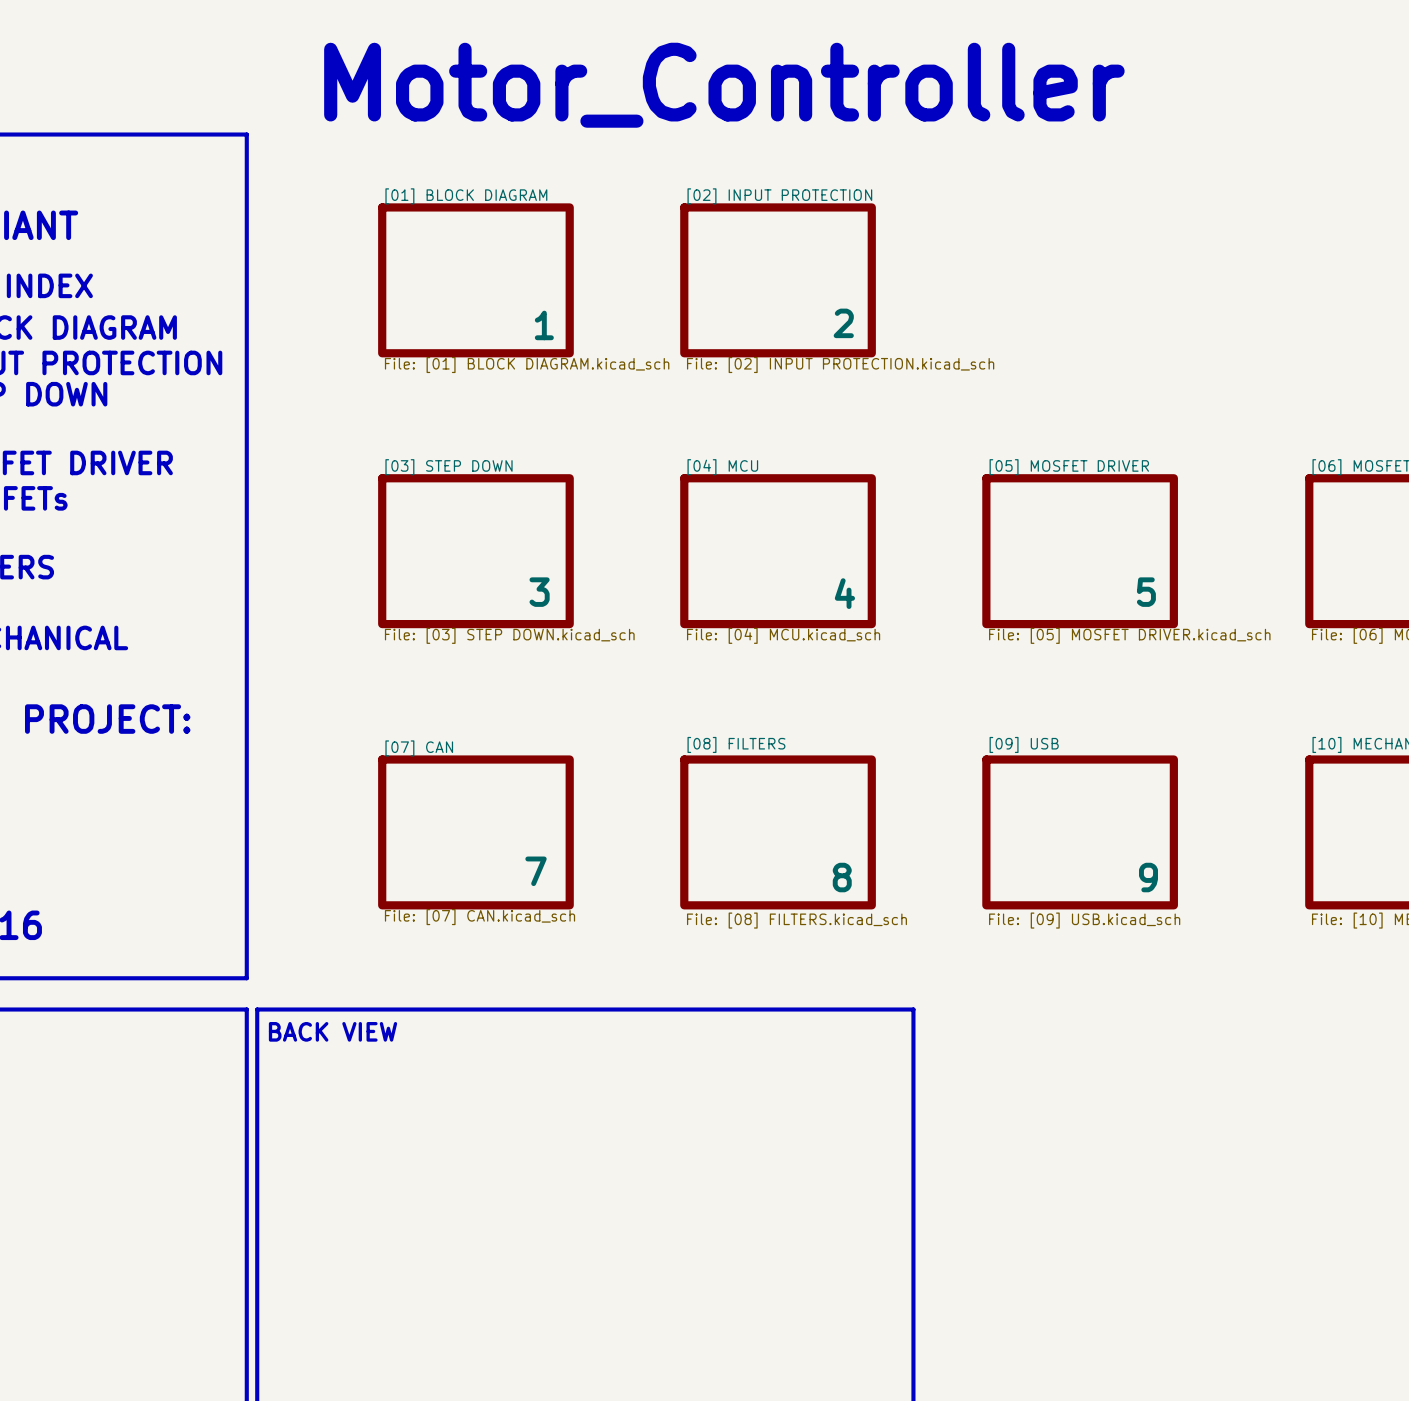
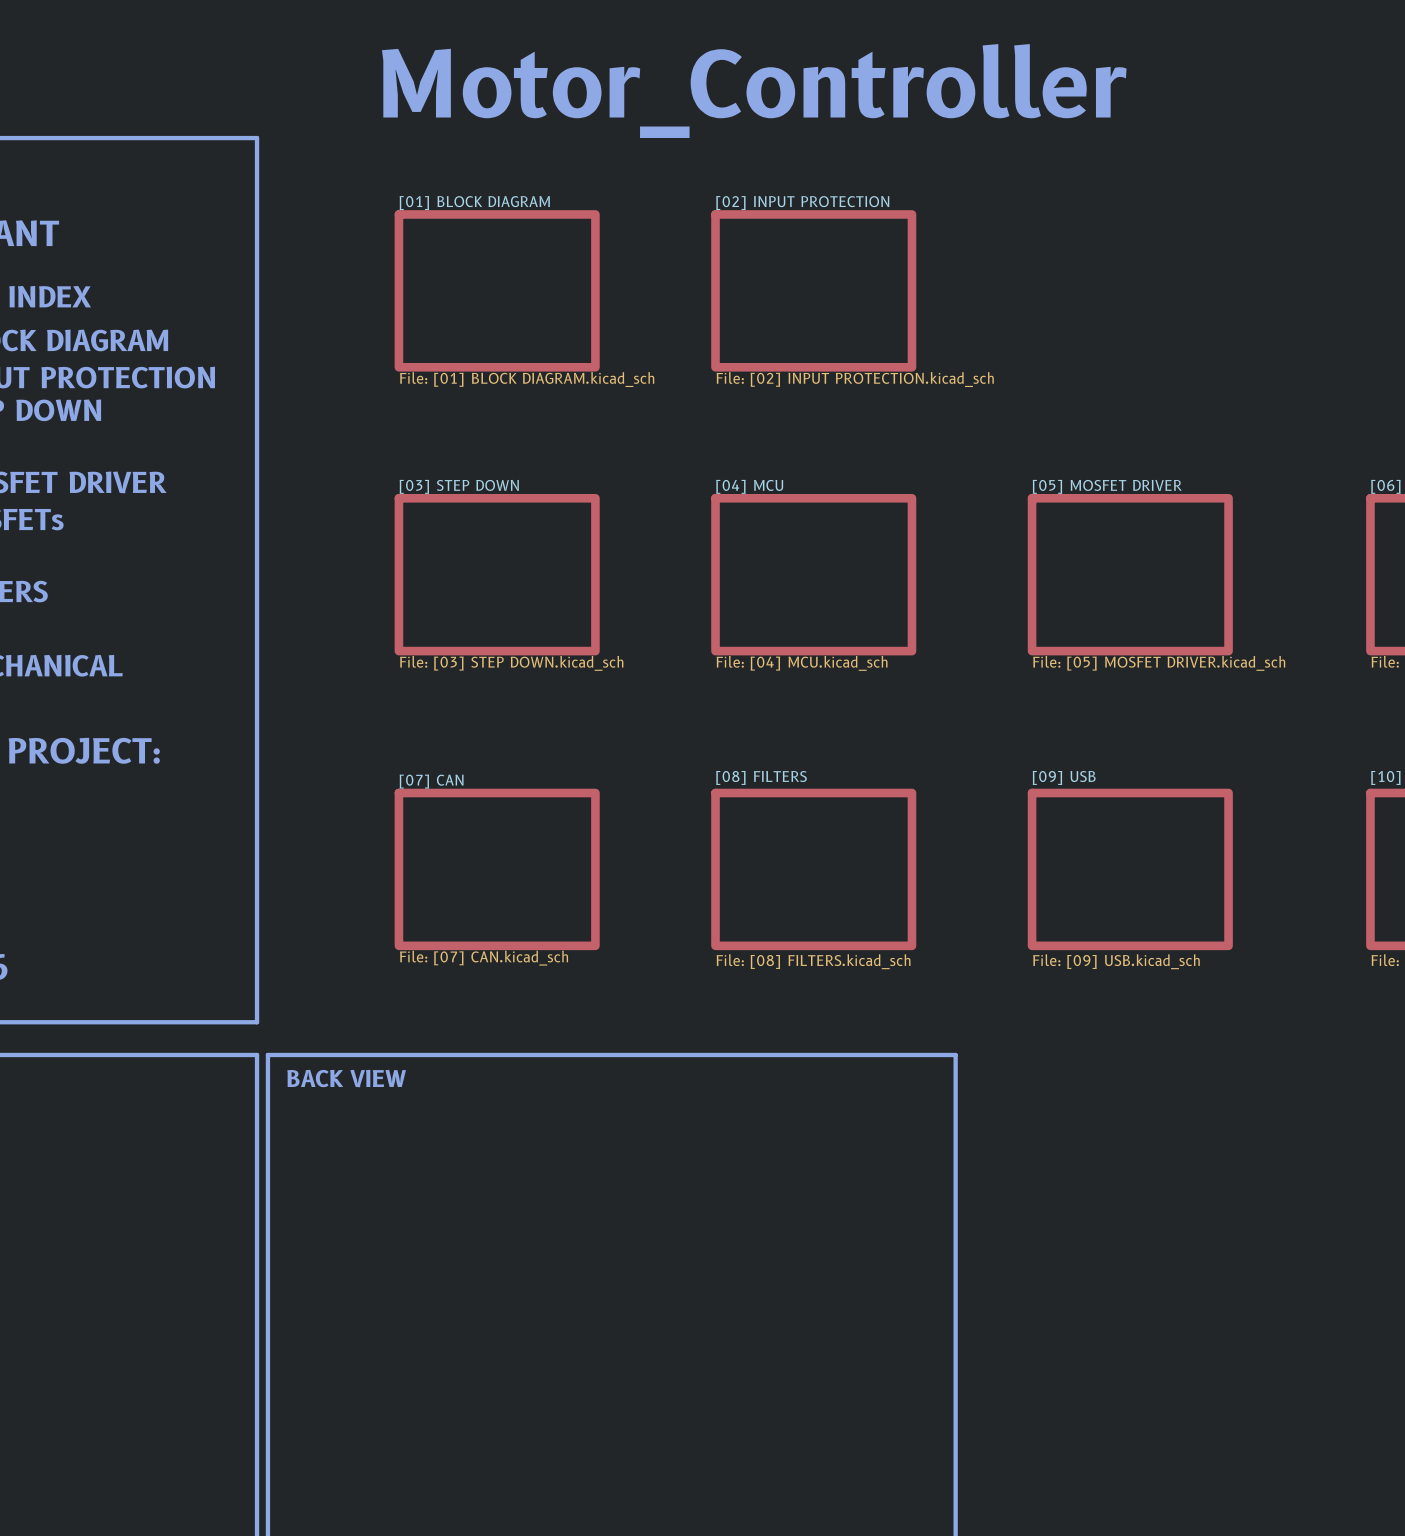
sheet [02] INPUT PROTECTION text: 2 (843, 323) -> none
sheet [01] BLOCK DIAGRAM text: 1 (544, 325) -> none
sheet [03] STEP DOWN text: 3 (539, 592) -> none
sheet [05] MOSFET DRIVER text: 5 (1146, 592) -> none
sheet [04] MCU text: 4 (844, 593) -> none
sheet [07] CAN text: 7 (536, 871) -> none
sheet [08] FILTERS text: 8 (842, 877) -> none
sheet [09] USB text: 9 (1148, 877) -> none

